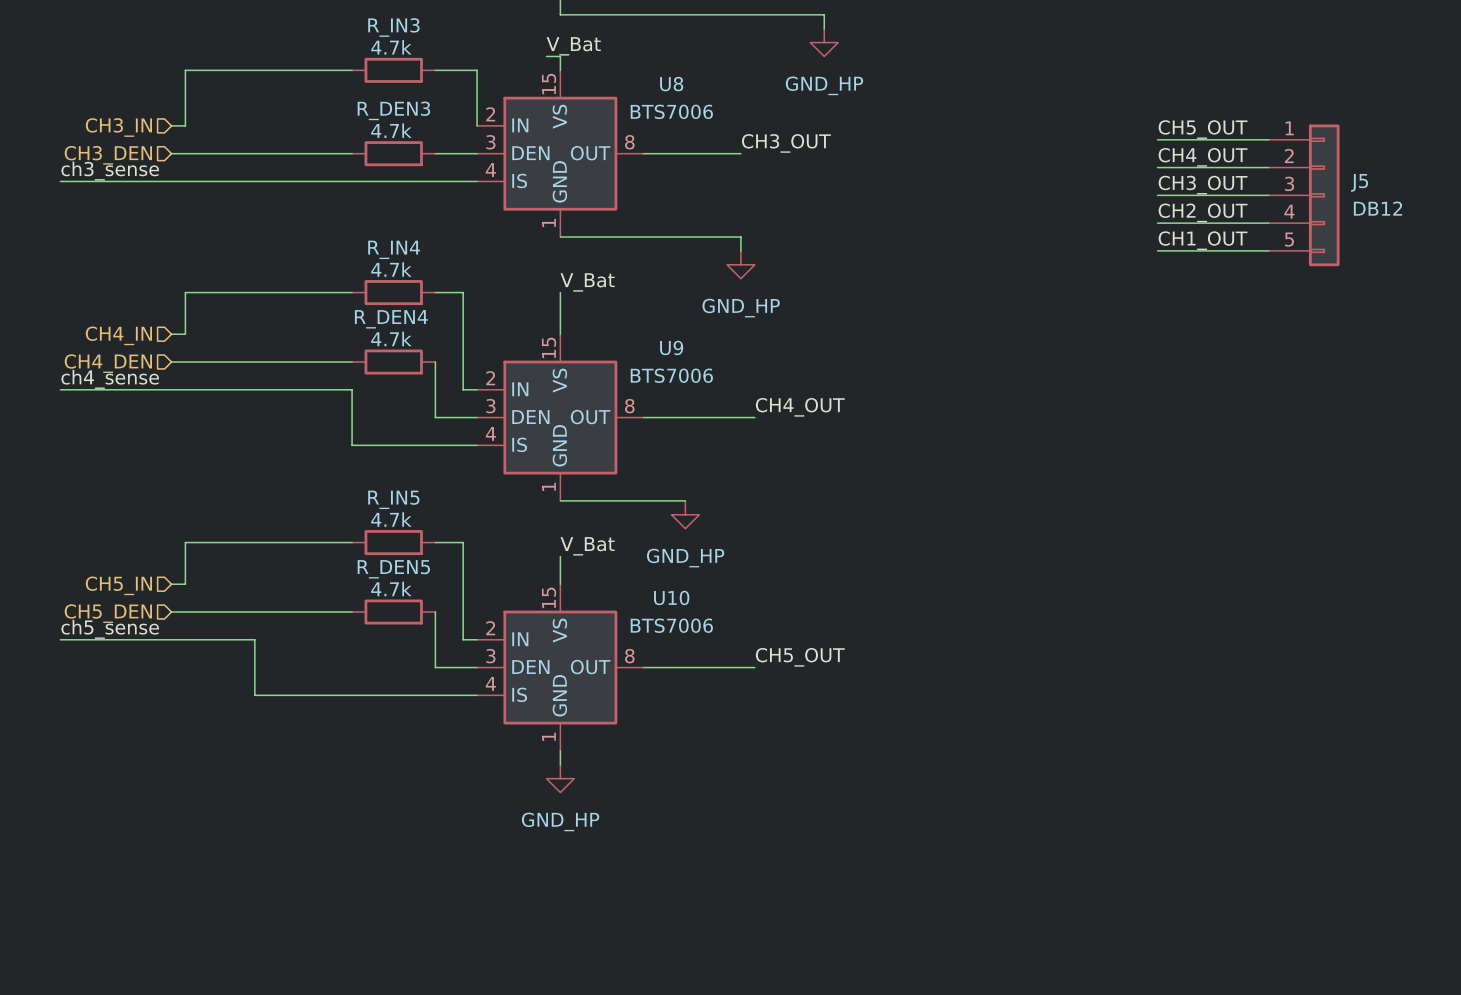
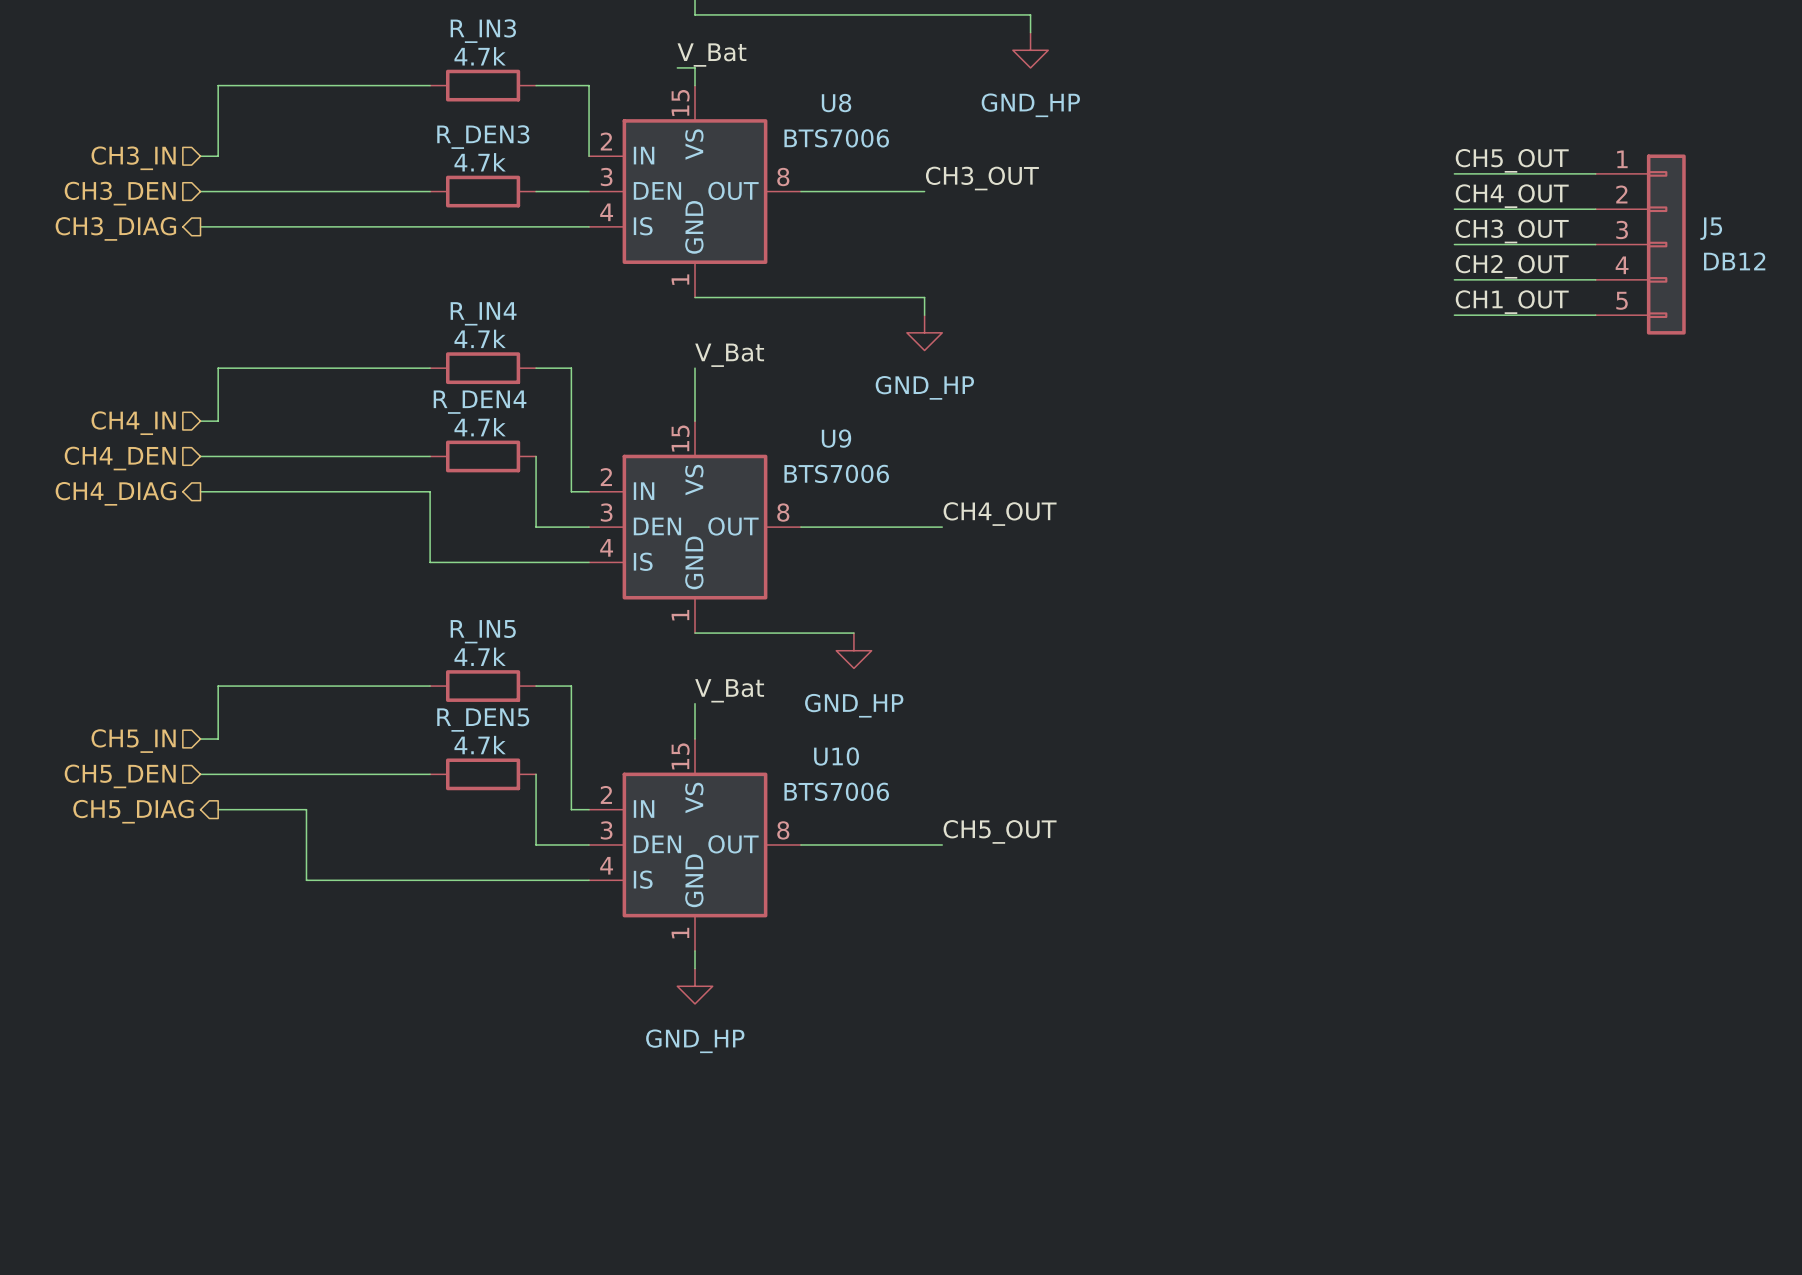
label: ch3_sense (110, 171) -> none
wire: (60, 181) (171, 181) -> none
hierarchical label: none -> CH3_DIAG (115, 228)
label: ch4_sense (110, 379) -> none
wire: (60, 389) (171, 389) -> none
hierarchical label: none -> CH4_DIAG (115, 493)
label: ch5_sense (110, 629) -> none
wire: (60, 639) (185, 639) -> none
hierarchical label: none -> CH5_DIAG (133, 811)

